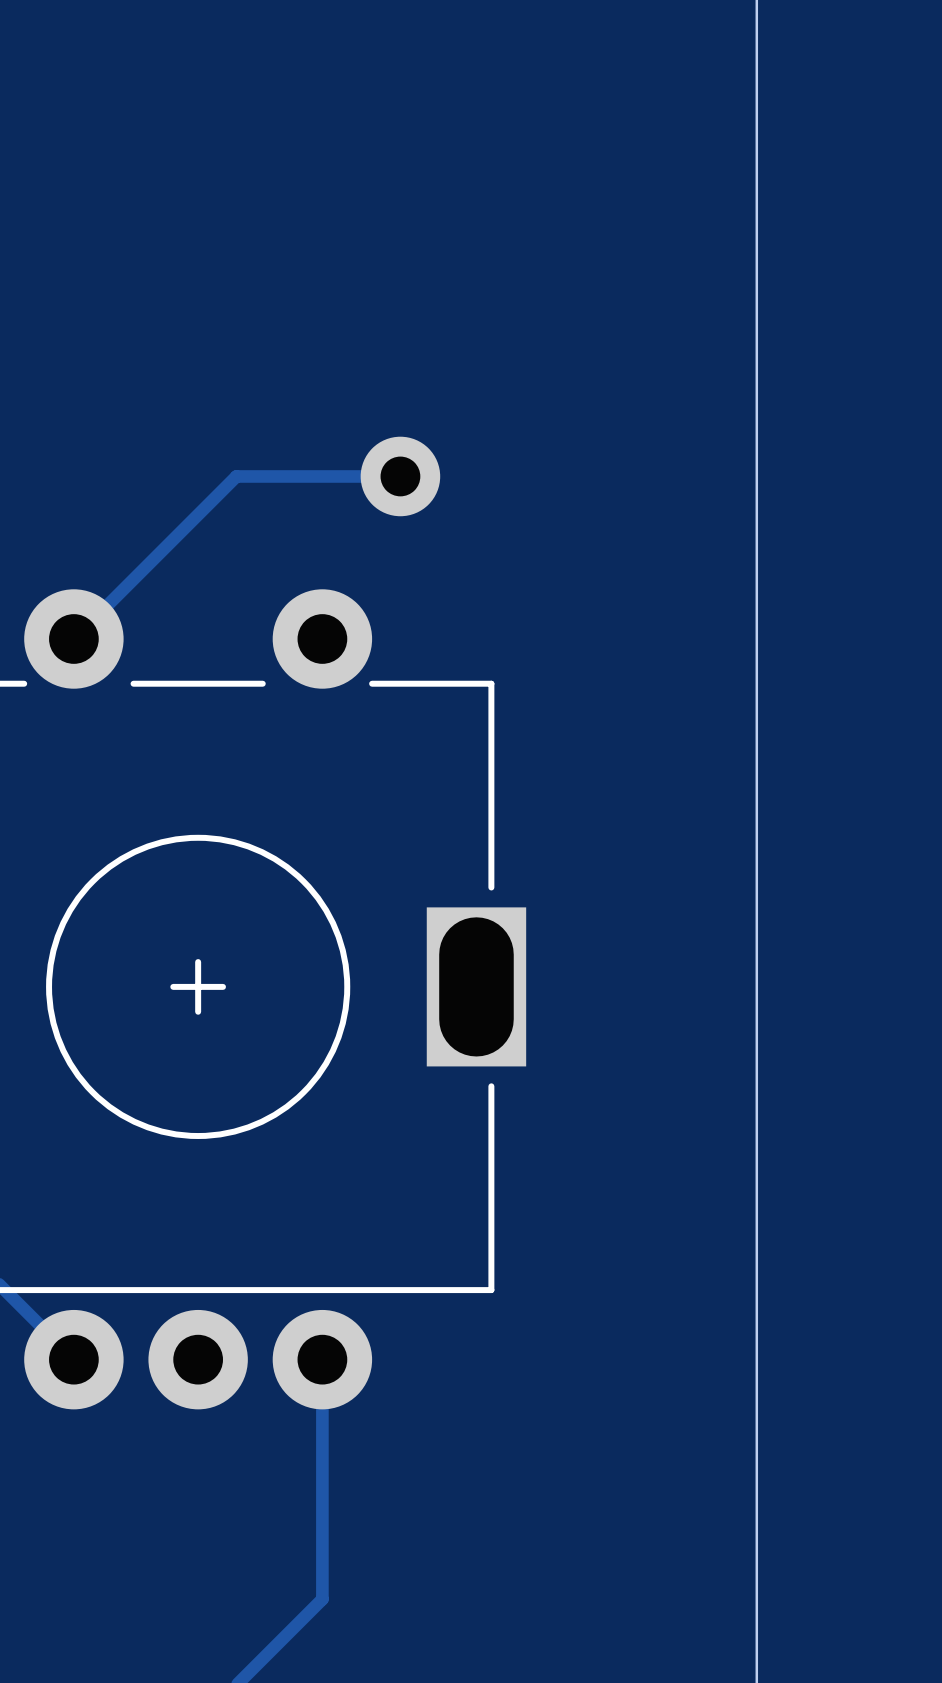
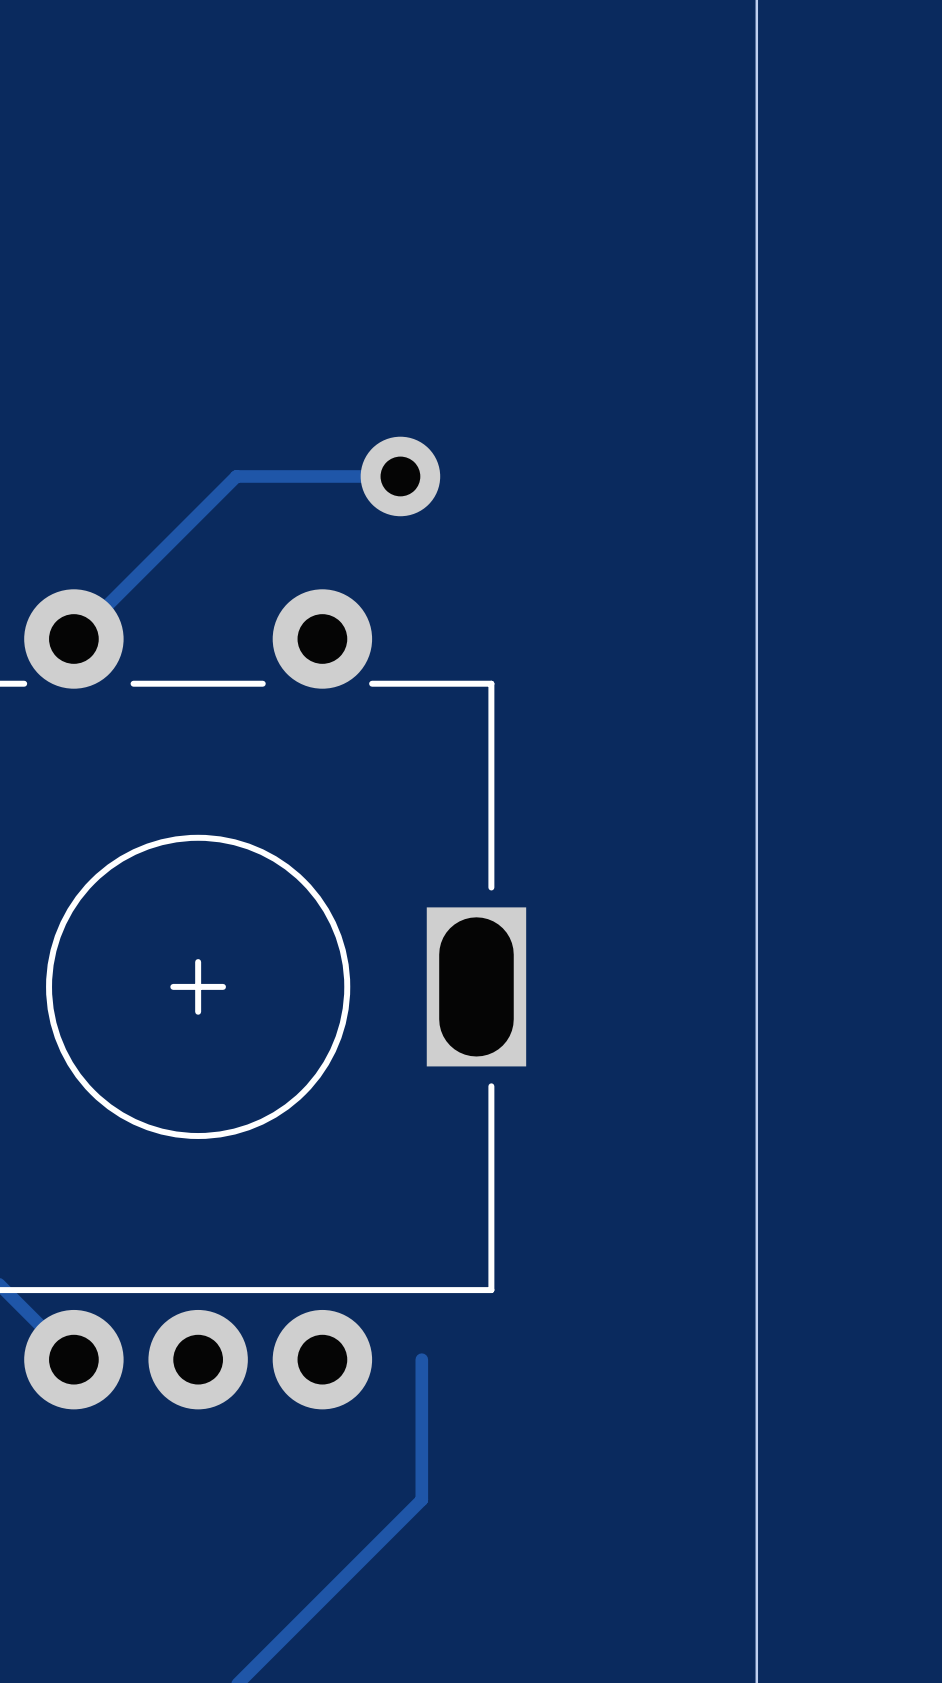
track: (322, 1359) (322, 1599) -> (421, 1359) (421, 1499) (322, 1599)

